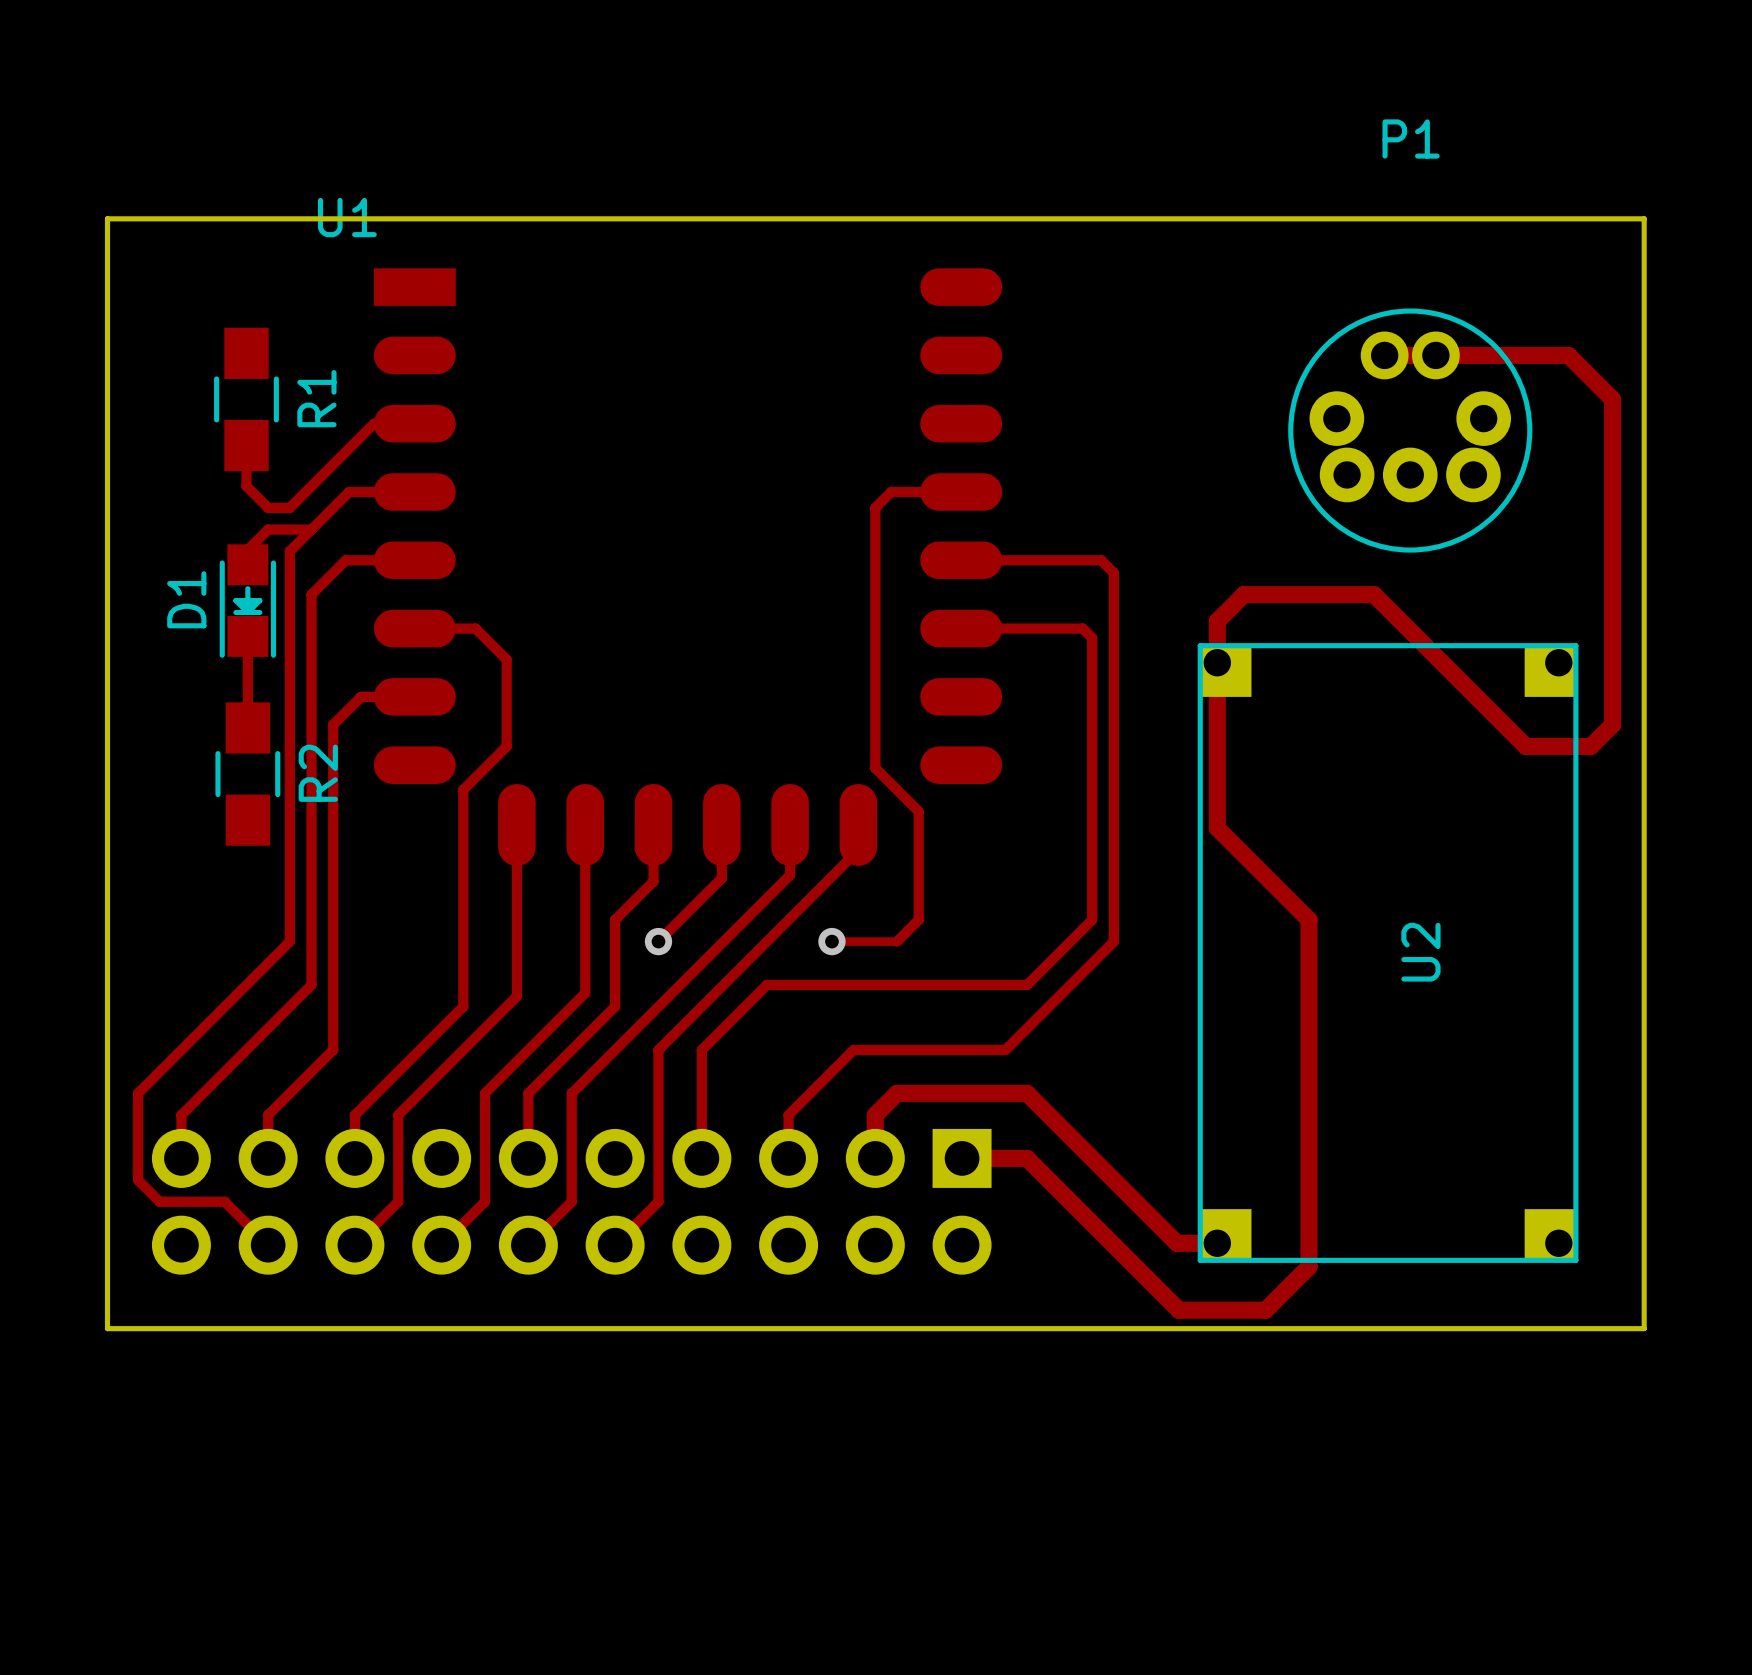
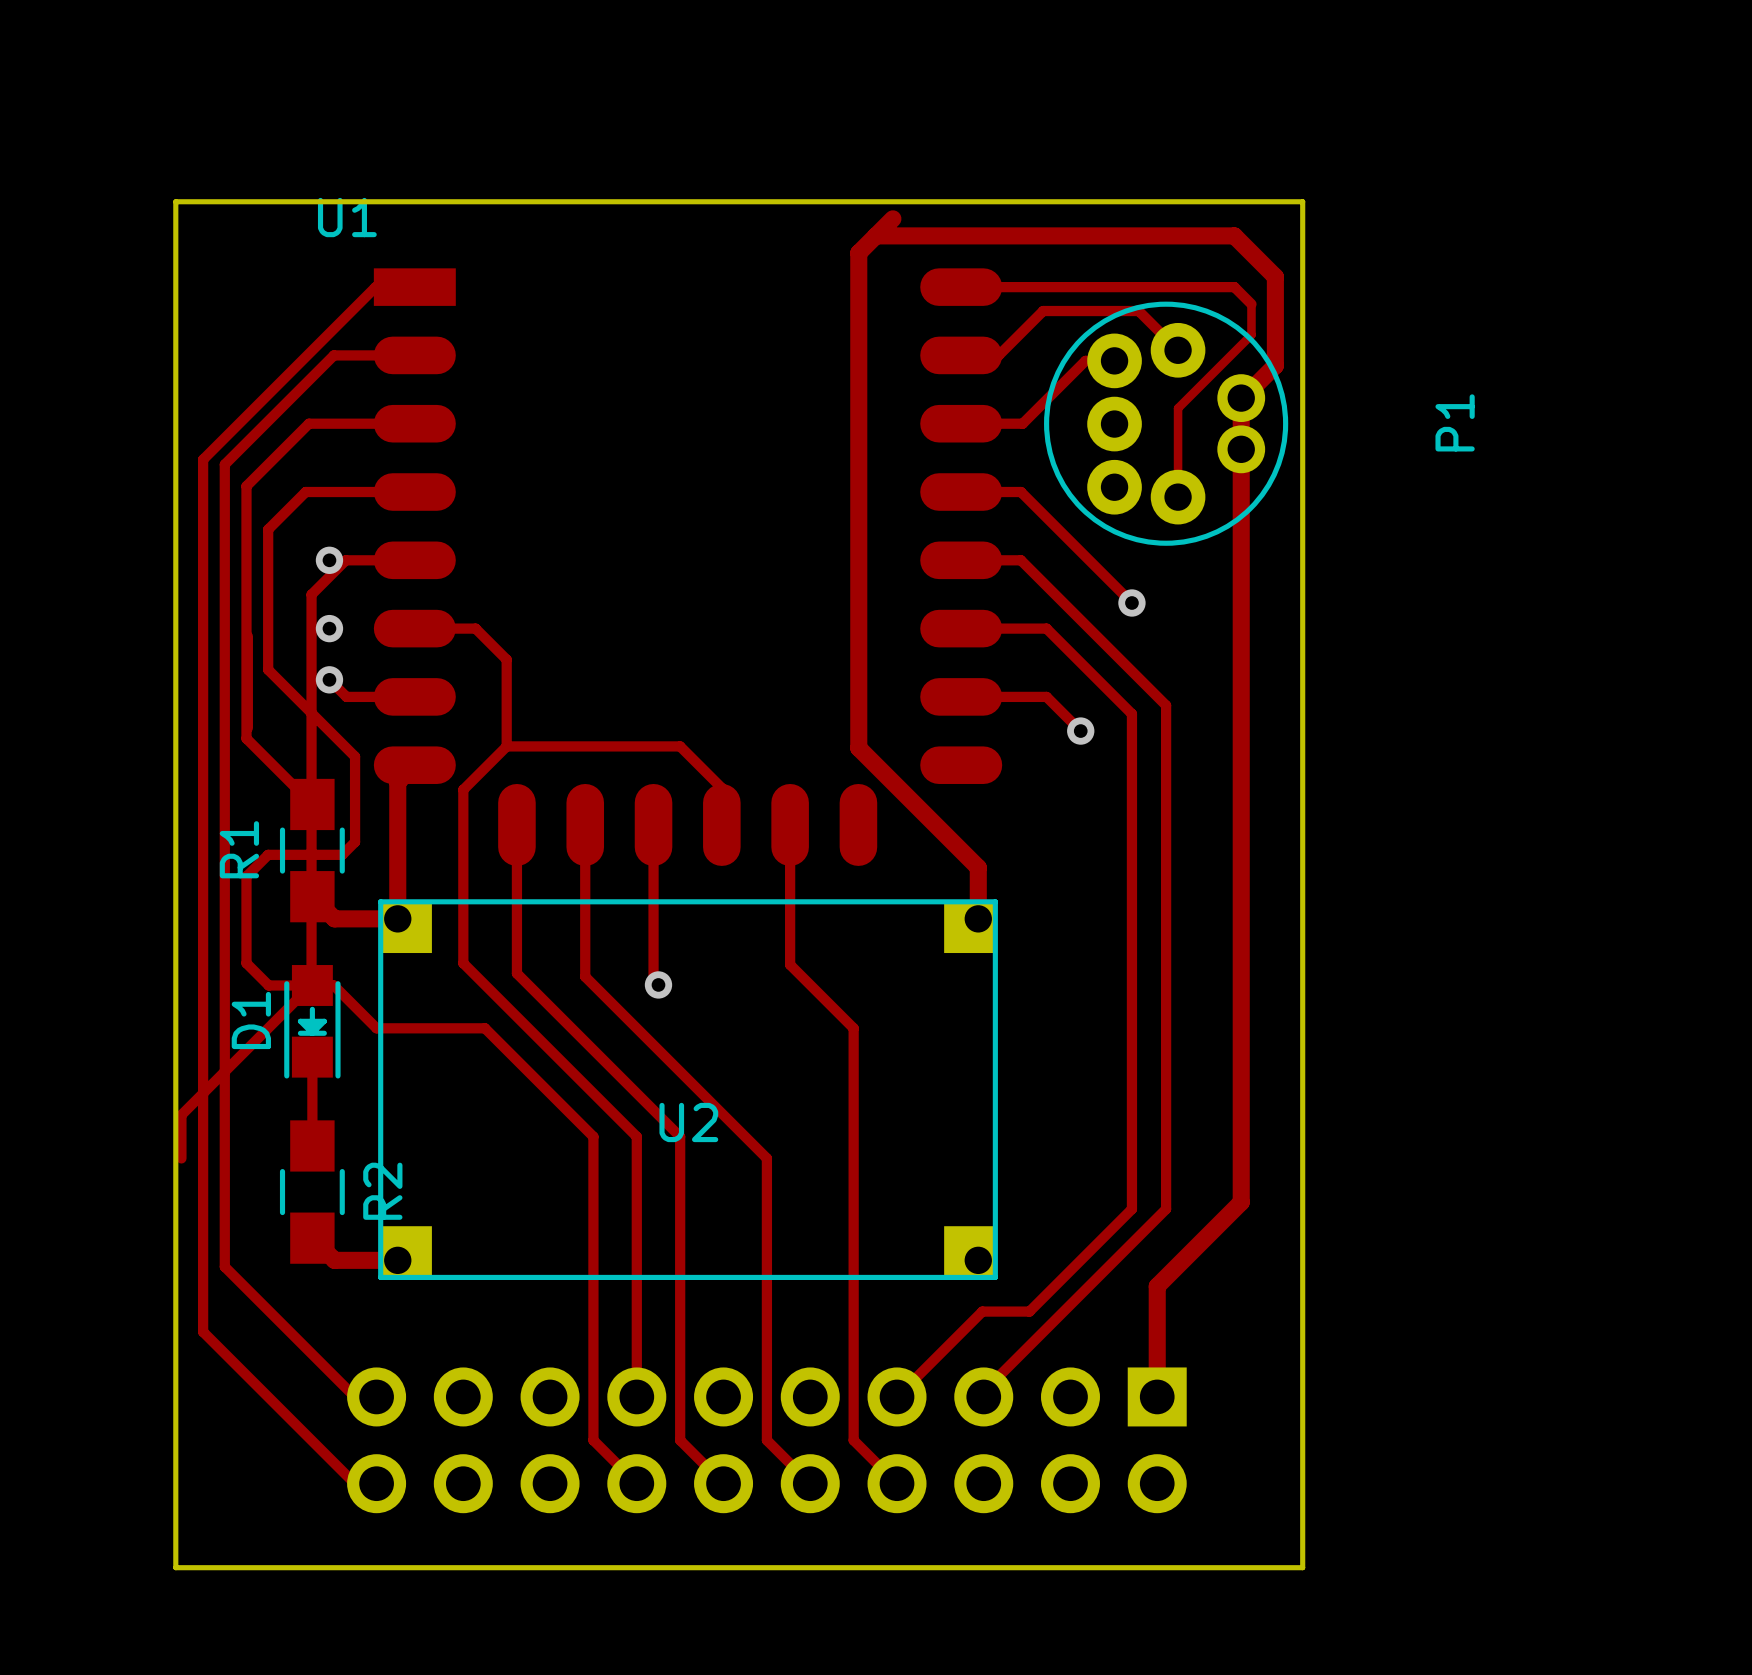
P1 name position: P1 (1411, 139) -> P1 (1455, 422)
board edge: (107, 218) (107, 1328) (1644, 1328) (1644, 218) (107, 218) -> (175, 201) (175, 1567) (1302, 1567) (1302, 201) (175, 201)
track: none -> (892, 218) (858, 252) (858, 748) (978, 867) (978, 918)
track: none -> (875, 235) (1234, 235) (1275, 276) (1275, 365) (1241, 398) (1241, 1202) (1157, 1286) (1157, 1396)
track: none -> (414, 287) (375, 287) (203, 459) (203, 1331) (354, 1483) (376, 1483)
track: none -> (961, 287) (1234, 287) (1251, 304) (1251, 334) (1178, 408) (1178, 497)
P1 footprint: [1288, 308, 1533, 553] -> [1044, 301, 1289, 546]
track: none -> (1178, 350) (1138, 311) (1043, 311) (998, 355) (961, 355)
track: none -> (414, 355) (333, 355) (224, 464) (224, 1266) (354, 1396) (376, 1396)
track: (1384, 355) (1568, 355) (1612, 399) (1612, 724) (1590, 746) (1525, 746) (1374, 594) (1243, 594) (1217, 621) (1217, 828) (1309, 919) (1309, 1266) (1265, 1310) (1178, 1310) (1027, 1158) (962, 1158) -> none
track: none -> (1114, 360) (1085, 360) (1022, 423) (961, 423)
R1 name position: R1 (316, 398) -> R1 (239, 849)
R1 position: (246, 399) -> (312, 850)
track: (374, 423) (305, 492) -> (349, 492) (305, 492)
track: none -> (374, 423) (308, 423) (246, 486) (246, 738) (312, 804)
track: (246, 445) (246, 486) (268, 507) (289, 507) -> (636, 1483) (593, 1440) (593, 1136) (485, 1028) (376, 1028) (333, 985) (268, 985) (246, 963) (246, 876) (268, 854) (342, 854) (355, 842) (355, 756) (268, 669) (268, 529) (289, 507)
track: (349, 492) (289, 551) (289, 941) (138, 1093) (138, 1180) (159, 1201) (224, 1201) (268, 1245) -> none
track: (961, 492) (891, 492) (875, 507) (875, 768) (918, 811) (918, 919) (897, 941) (831, 941) -> (961, 492) (1020, 492) (1131, 602)
track: (311, 529) (268, 529) (247, 549) (247, 564) -> none
via: none -> (329, 560)
track: (1020, 560) (1101, 560) (1113, 572) (1113, 941) (1005, 1050) (853, 1050) (788, 1115) (788, 1158) -> (1020, 560) (1166, 705) (1166, 1209) (983, 1391) (983, 1396)
D1 position: (247, 601) -> (312, 1021)
via: none -> (1131, 602)
via: none -> (329, 628)
track: (1046, 628) (1082, 628) (1092, 638) (1092, 919) (1027, 984) (766, 984) (701, 1050) (701, 1158) -> (1046, 628) (1131, 713) (1131, 1209) (1029, 1311) (982, 1311) (897, 1396)
via: none -> (329, 679)
track: (361, 696) (333, 724) (333, 1050) (268, 1115) (268, 1158) -> (361, 696) (346, 696) (329, 679)
track: none -> (961, 696) (1046, 696) (1080, 731)
via: none -> (1080, 731)
track: none -> (414, 765) (397, 782) (397, 918) (334, 918) (312, 896)
R2 position: (247, 774) -> (312, 1192)
track: (721, 824) (721, 878) (658, 941) -> (721, 824) (721, 788) (680, 746) (506, 746)
track: (858, 824) (858, 850) (658, 1050) (658, 1201) (615, 1245) -> none
track: (790, 874) (571, 1093) (571, 1201) (528, 1245) -> (790, 874) (790, 964) (853, 1028) (853, 1440) (897, 1483)
track: (653, 881) (615, 919) (615, 1006) (528, 1093) (528, 1158) -> (653, 881) (653, 979) (658, 984)
via position: (658, 941) -> (658, 984)
via: (831, 941) -> none
U2 rotation: 0° (1388, 953) -> 90° clockwise (688, 1089)
U2 position: (1388, 953) -> (688, 1089)
track: (463, 963) (463, 1006) (354, 1115) (354, 1158) -> (463, 963) (636, 1136) (636, 1396)
track: (516, 973) (516, 996) (398, 1115) (398, 1201) (354, 1245) -> (516, 973) (680, 1136) (680, 1440) (723, 1483)
track: (585, 976) (585, 993) (485, 1093) (485, 1201) (441, 1245) -> (585, 976) (766, 1158) (766, 1440) (810, 1483)
track: none -> (312, 1057) (312, 1145)
track: (875, 1158) (875, 1115) (897, 1093) (1027, 1093) (1177, 1243) (1217, 1243) -> none
part position: (571, 1201) -> (766, 1440)
track: none -> (312, 1238) (334, 1260) (397, 1260)

